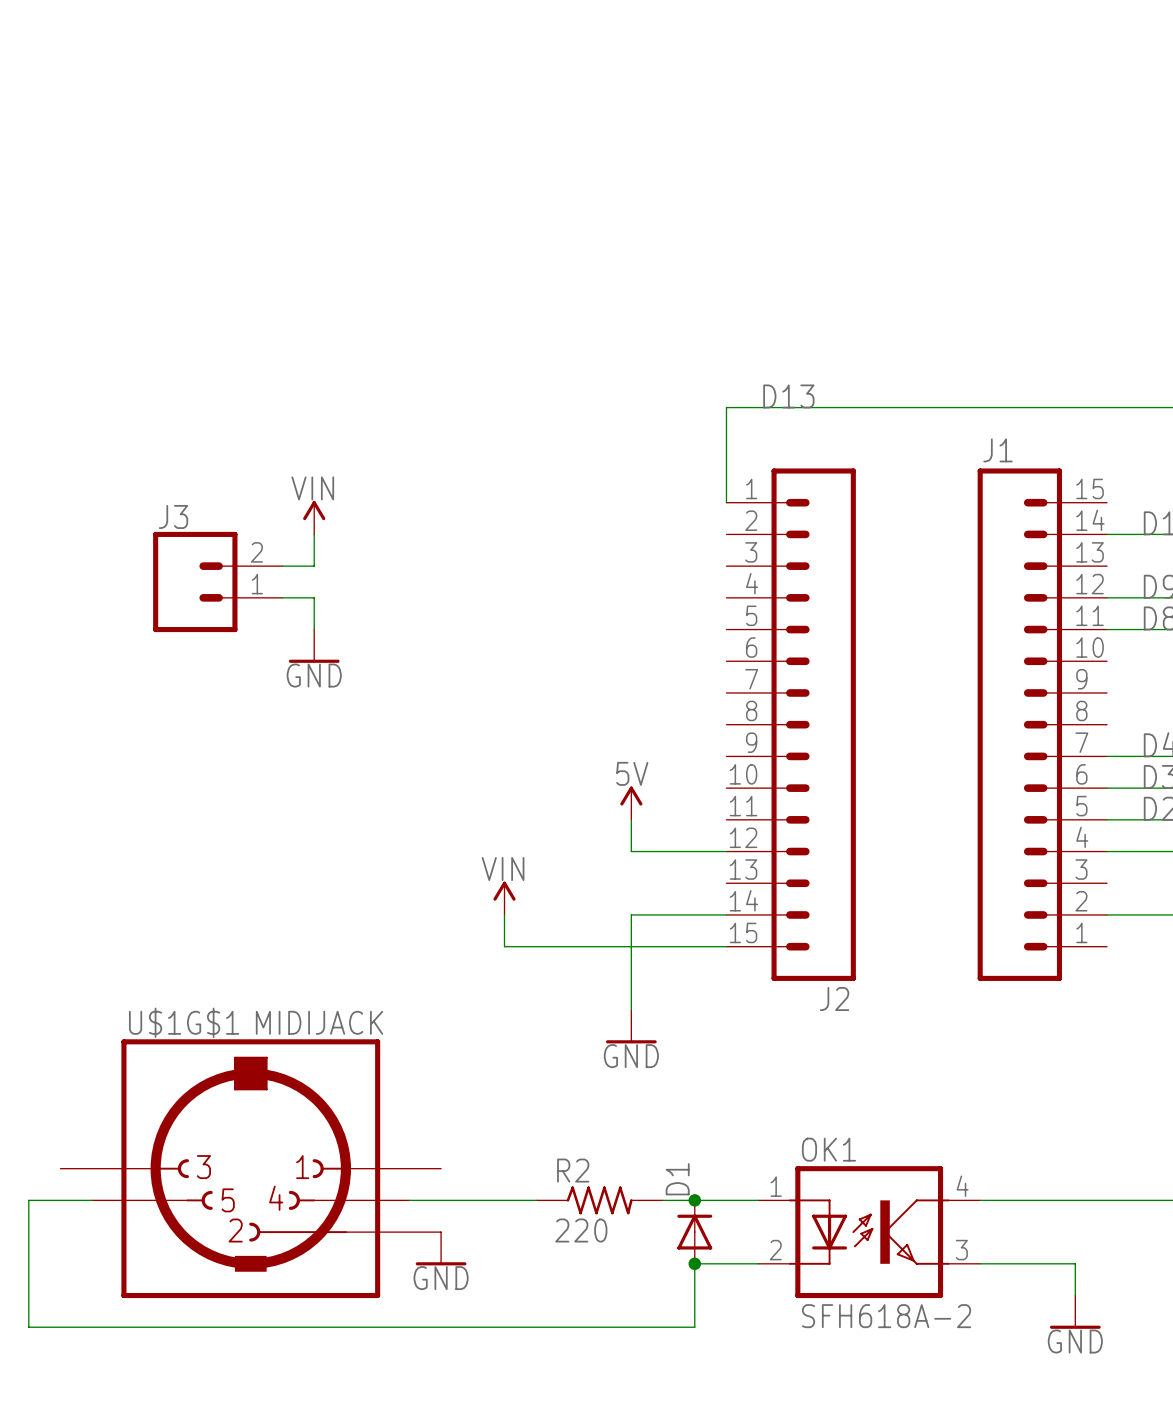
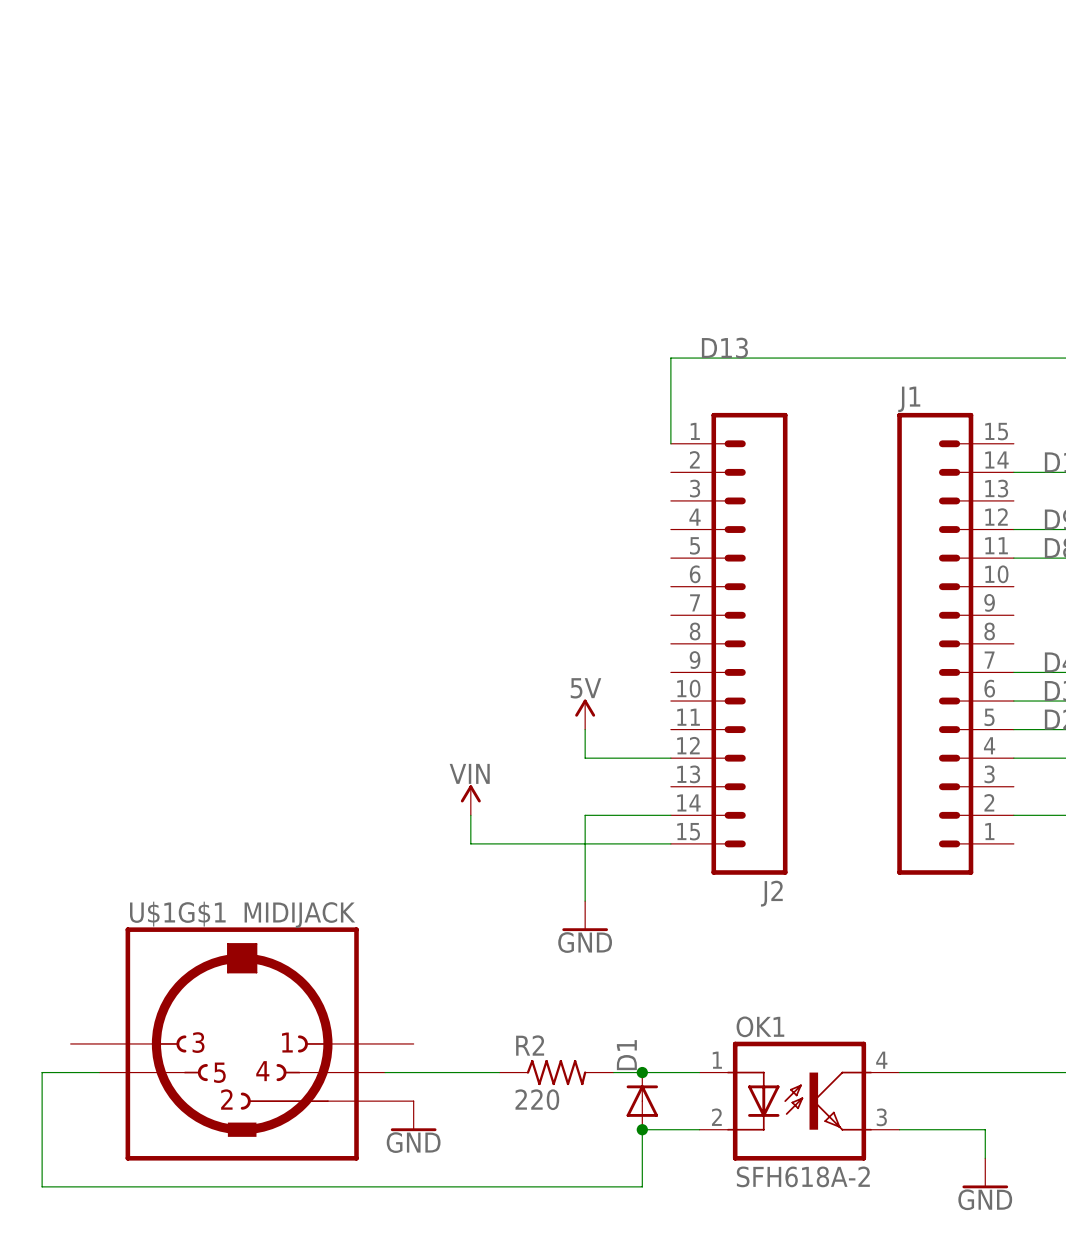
power symbol: VIN (314, 517) -> none
wire: (314, 534) (314, 566) (282, 566) -> none
J3: (217, 581) -> none
wire: (282, 597) (314, 597) (314, 629) -> none
power symbol: GND (314, 646) -> none

